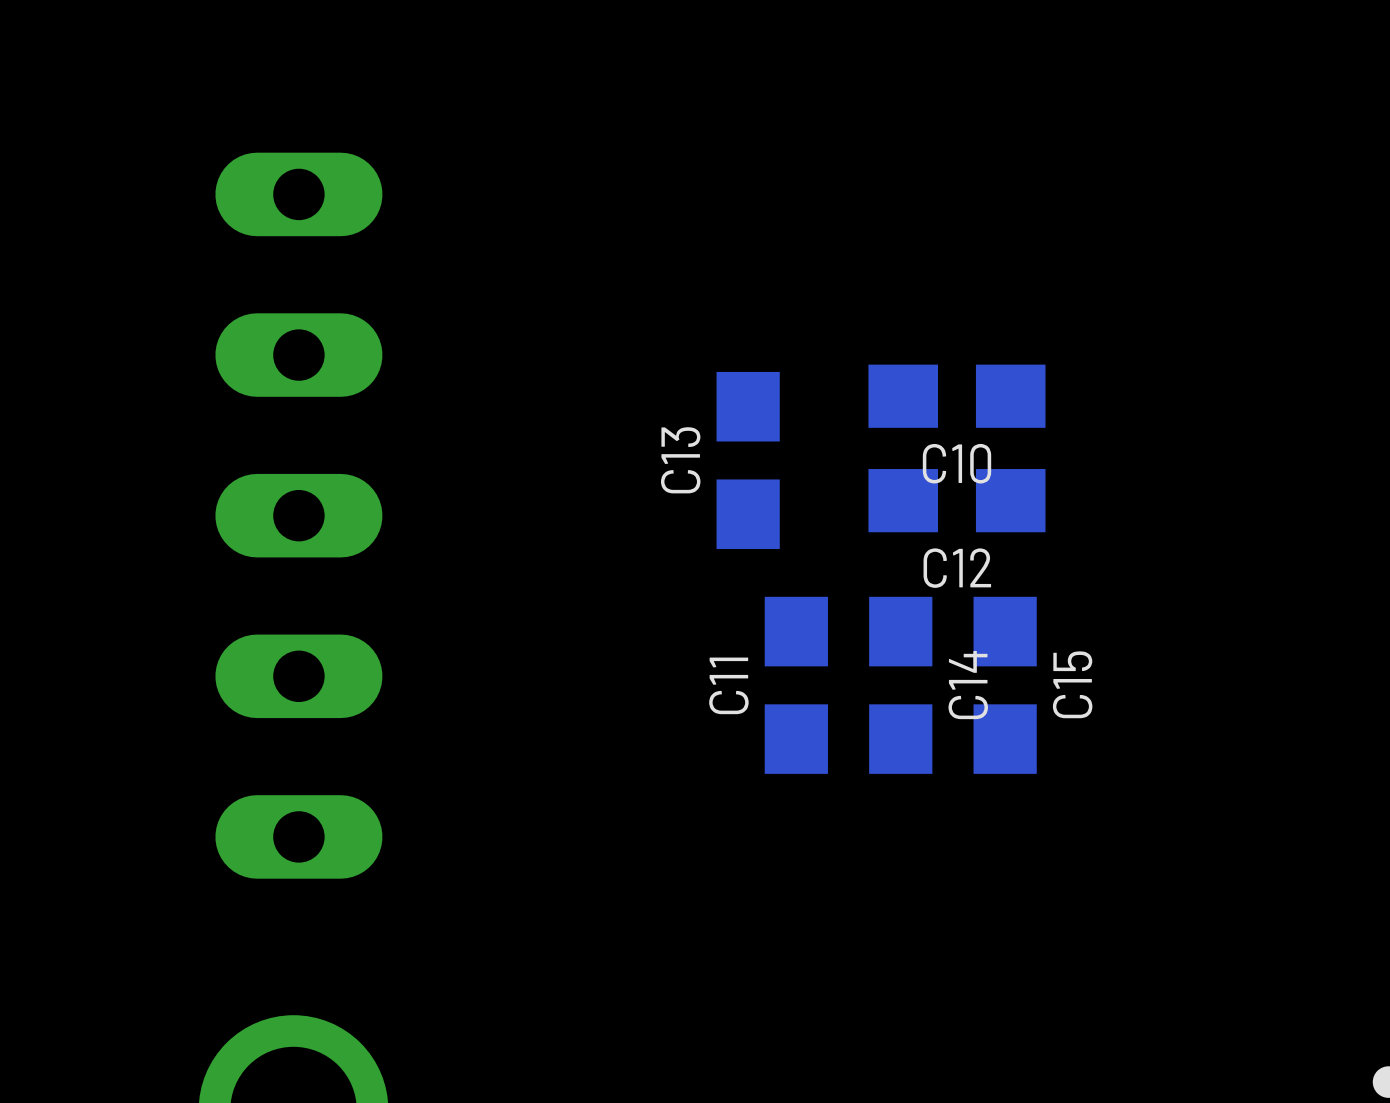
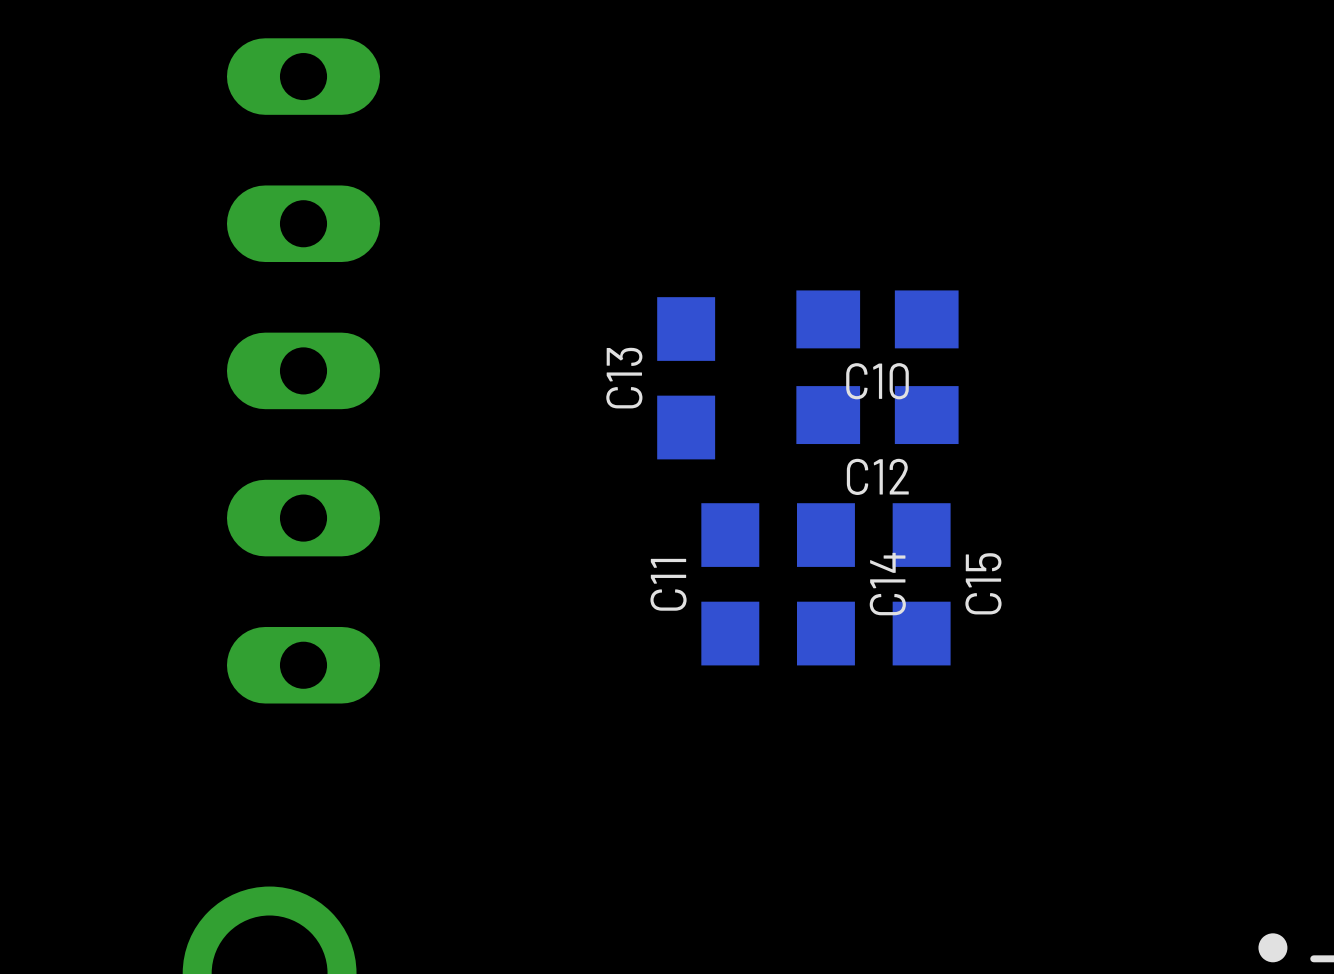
part position: (298, 515) -> (303, 370)

